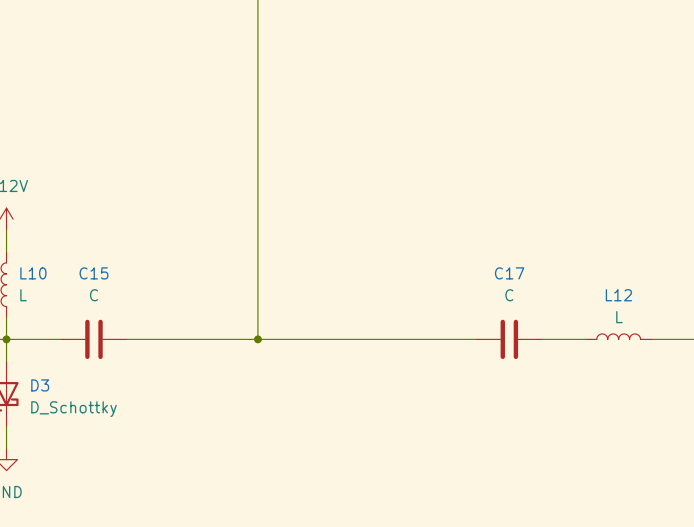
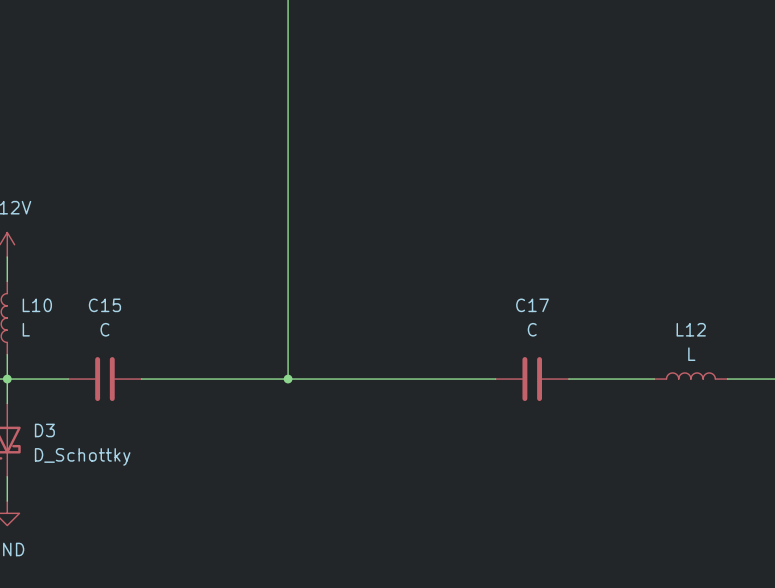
C17 position: (509, 339) -> (532, 379)

